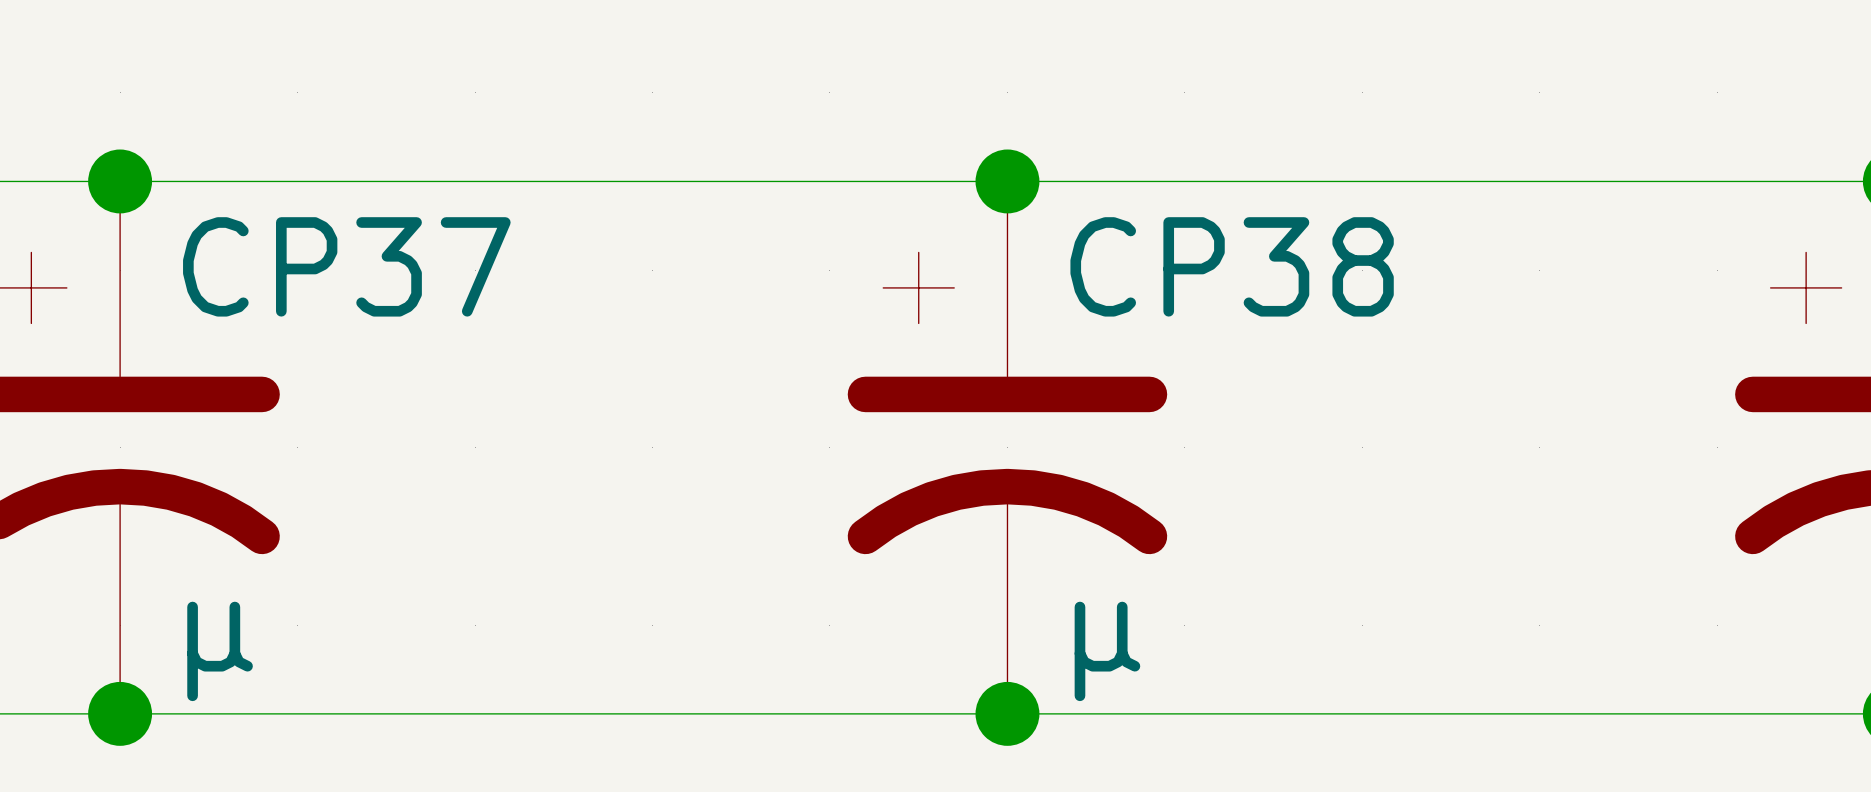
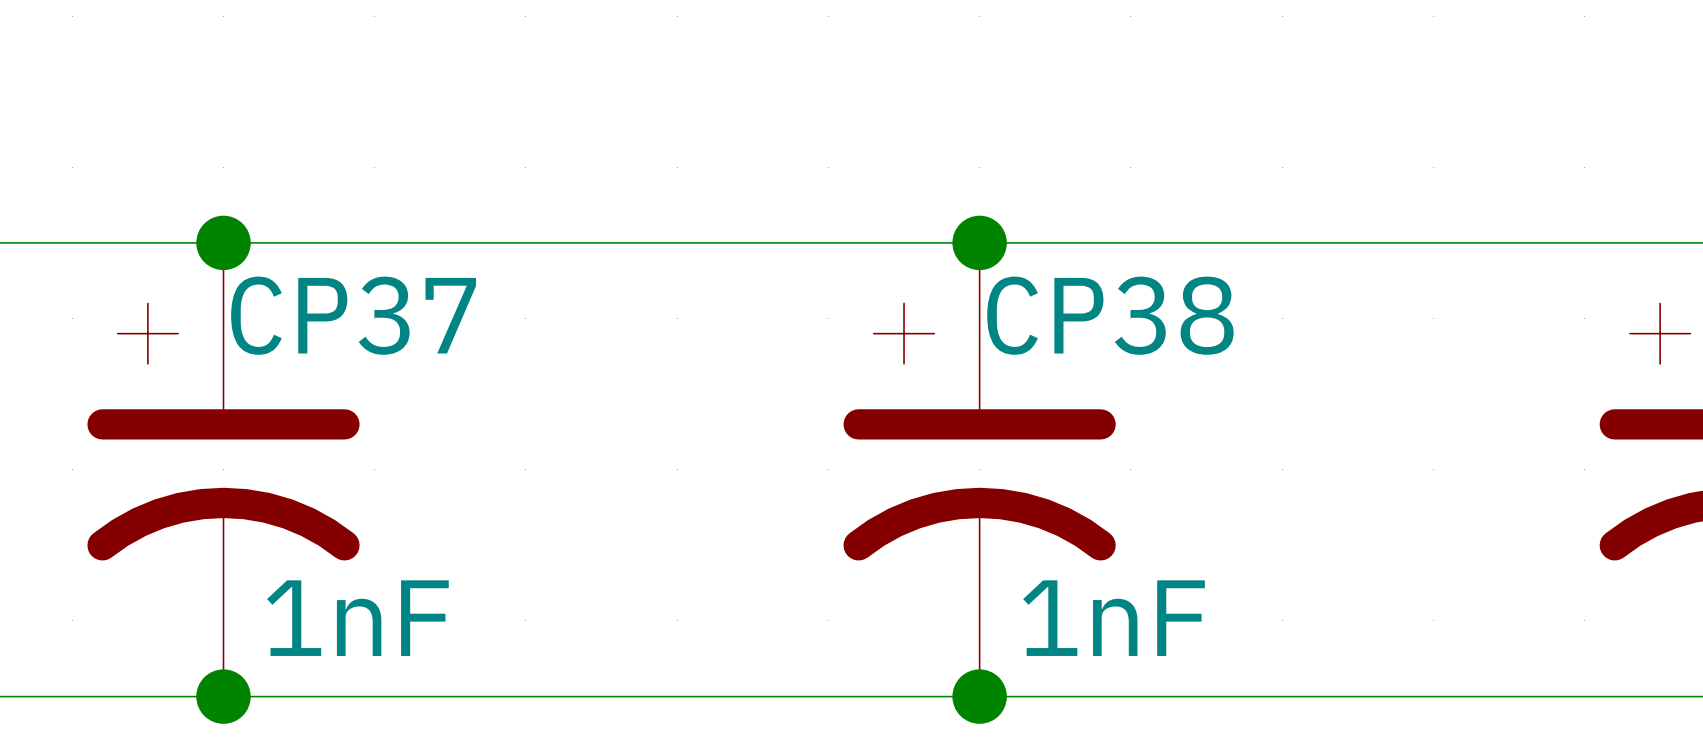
CP37 name position: CP37 (346, 266) -> CP37 (353, 315)
CP38 name position: CP38 (1232, 266) -> CP38 (1110, 315)
CP37 value: μ (220, 651) -> 1nF (357, 618)
CP38 value: μ (1107, 651) -> 1nF (1114, 618)

